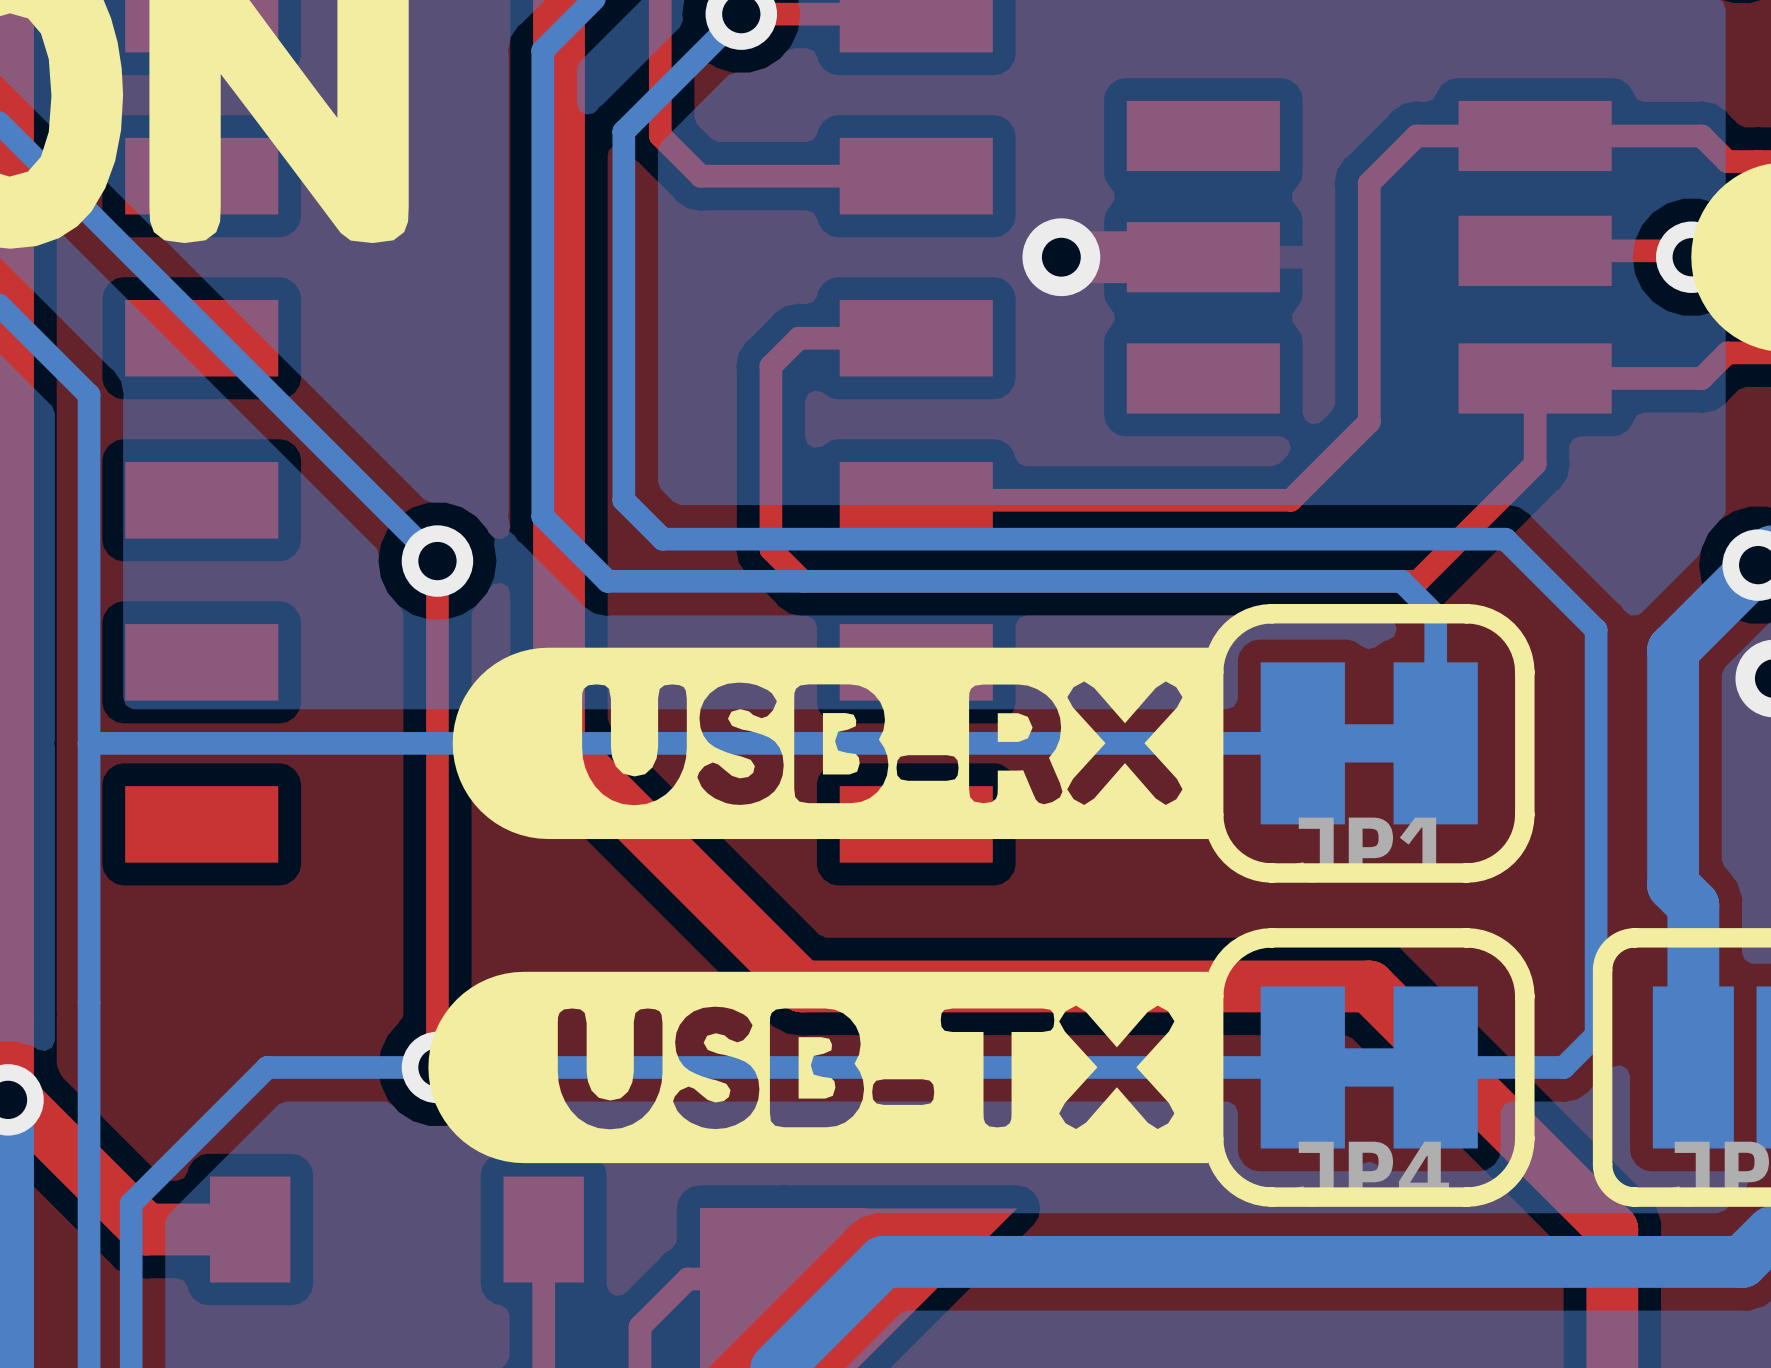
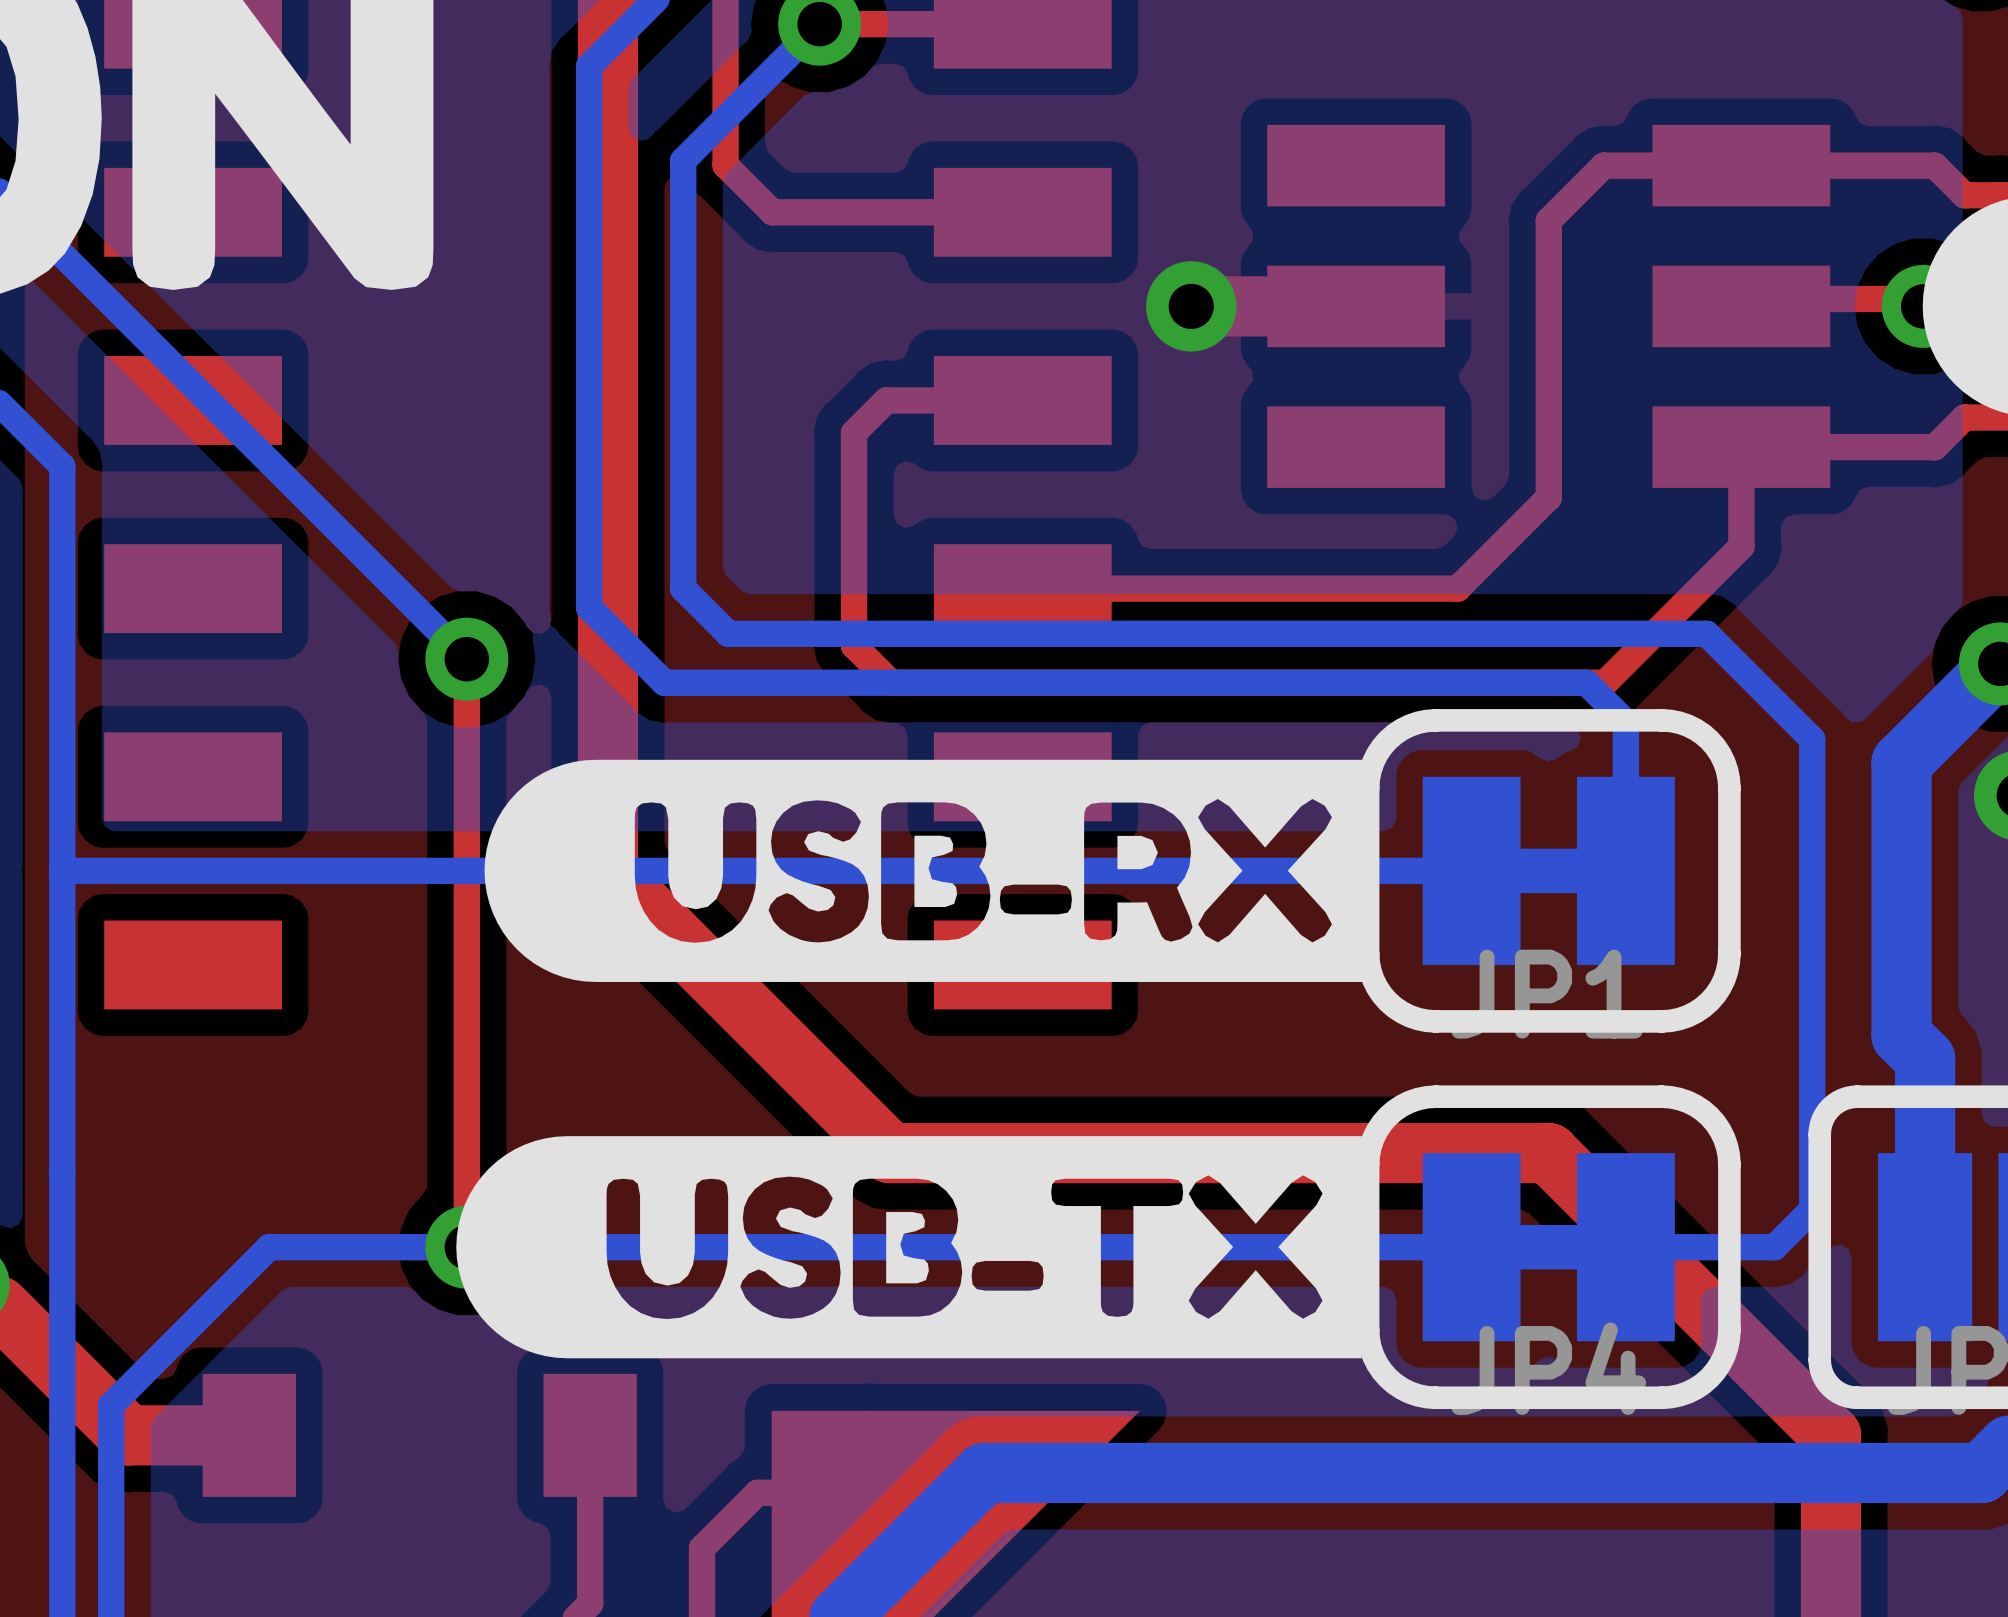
part footprint: [1126, 100, 1612, 414] -> [1267, 124, 1831, 488]

